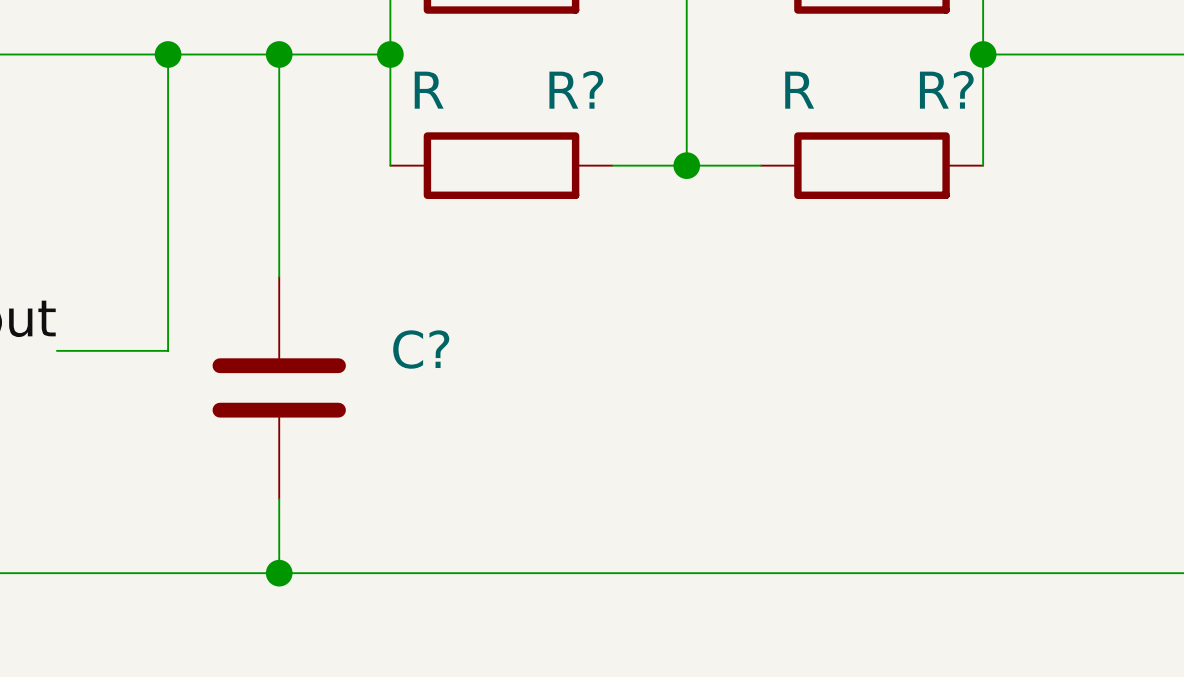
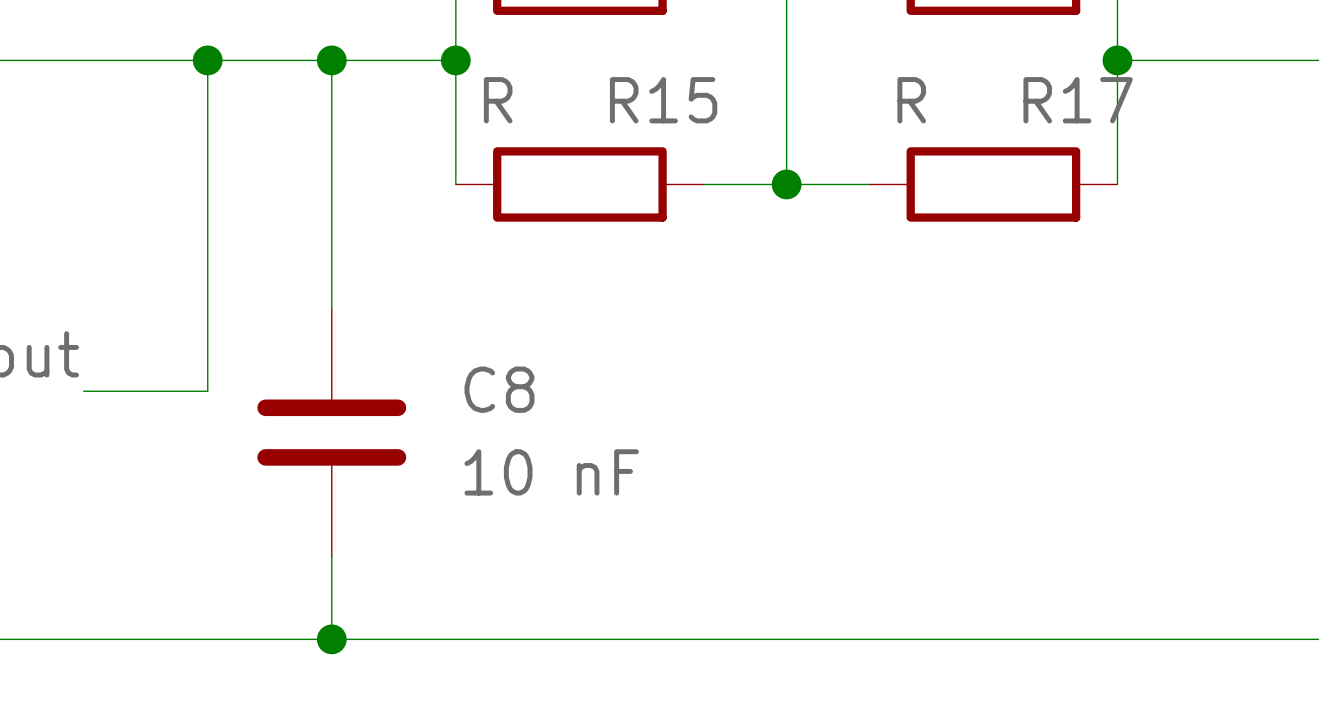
R? name: R? (576, 89) -> R15 (663, 100)
R? name: R? (946, 89) -> R17 (1078, 100)
C? name: C? (421, 349) -> C8 (499, 389)
C? value: none -> 10 nF (551, 472)

